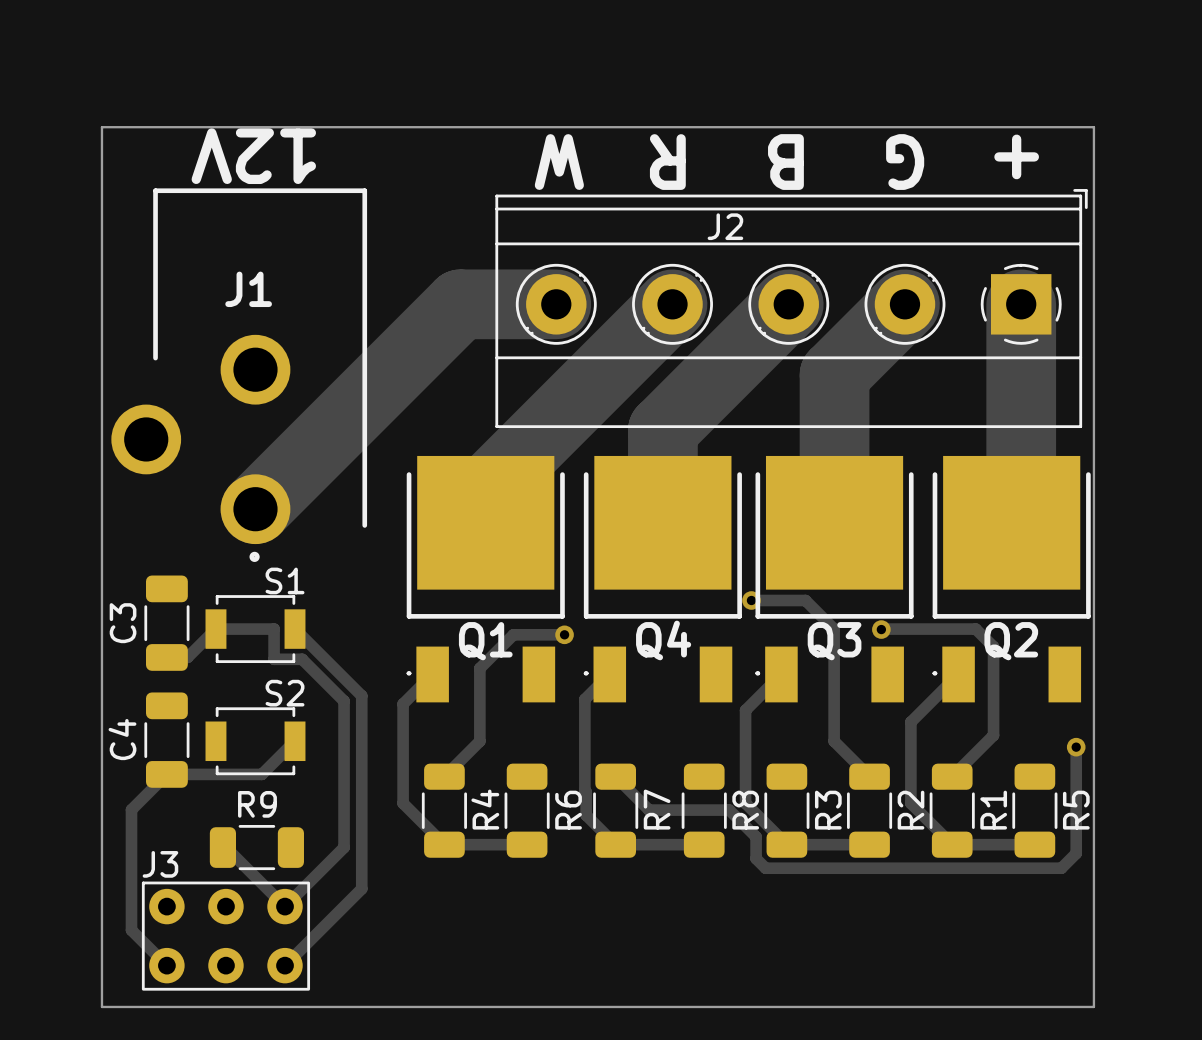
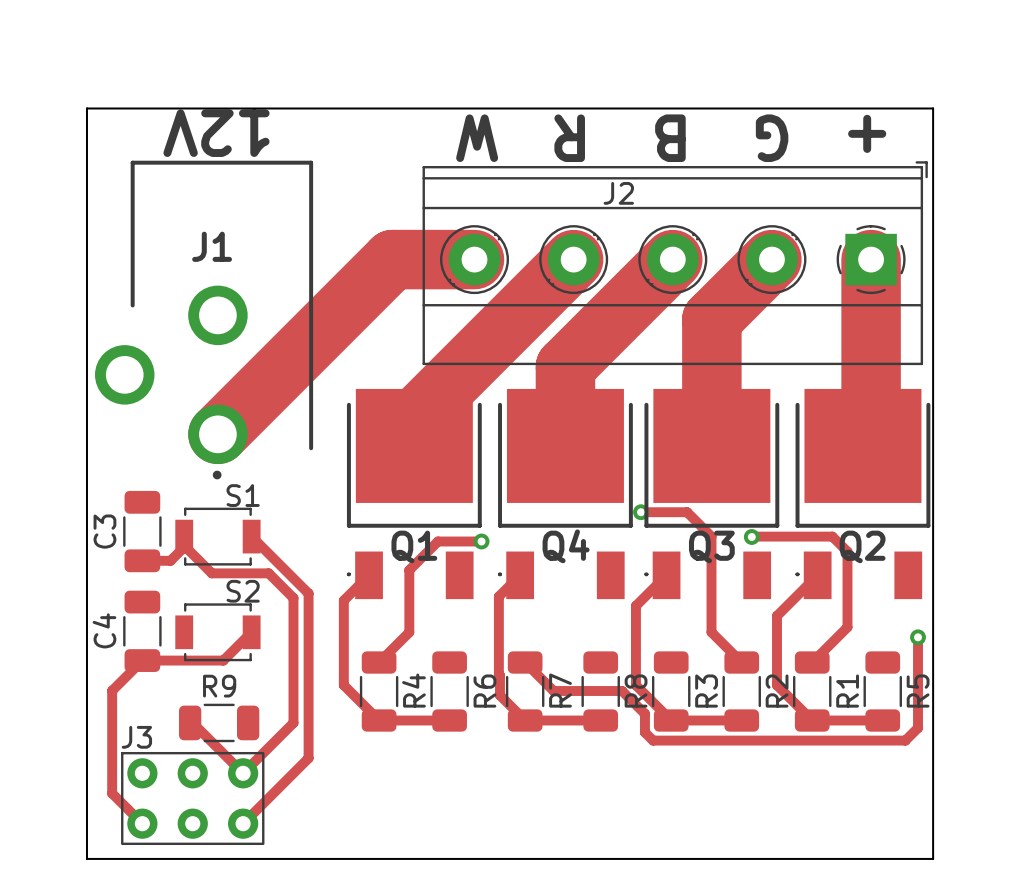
track: none -> (184, 536) (184, 547) (170, 560) (160, 560)
track: (187, 657) (215, 629) (274, 629) (274, 659) (302, 659) (315, 672) -> (184, 545) (211, 573) (268, 573)

